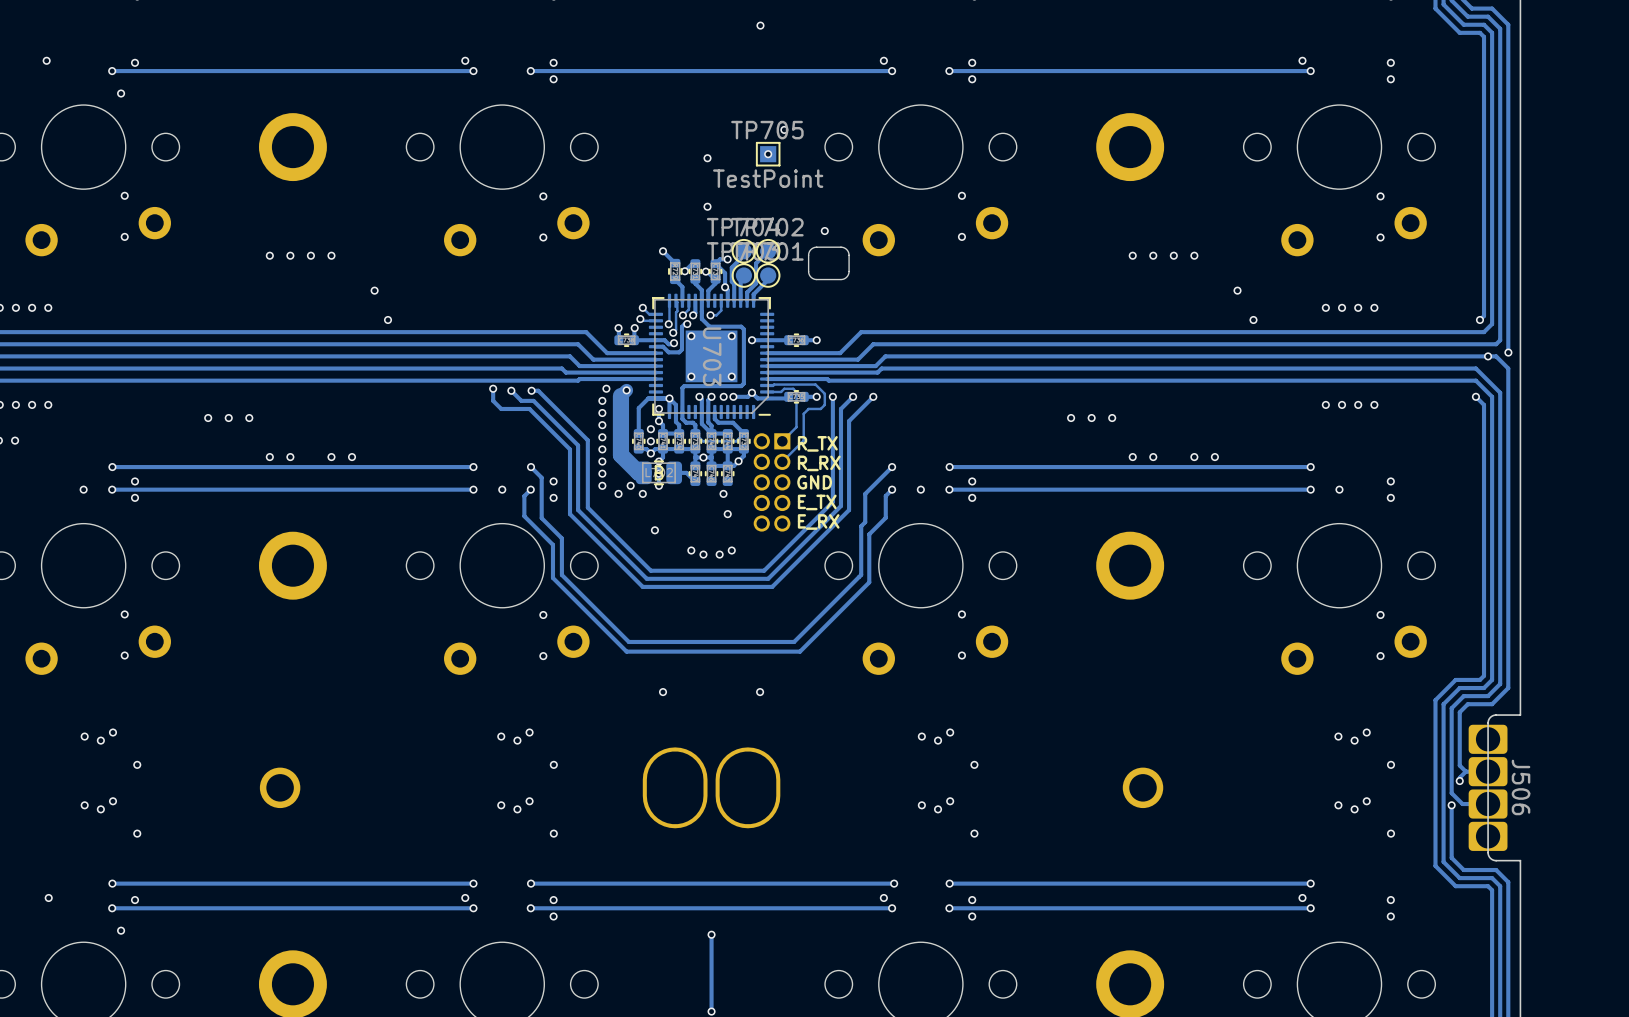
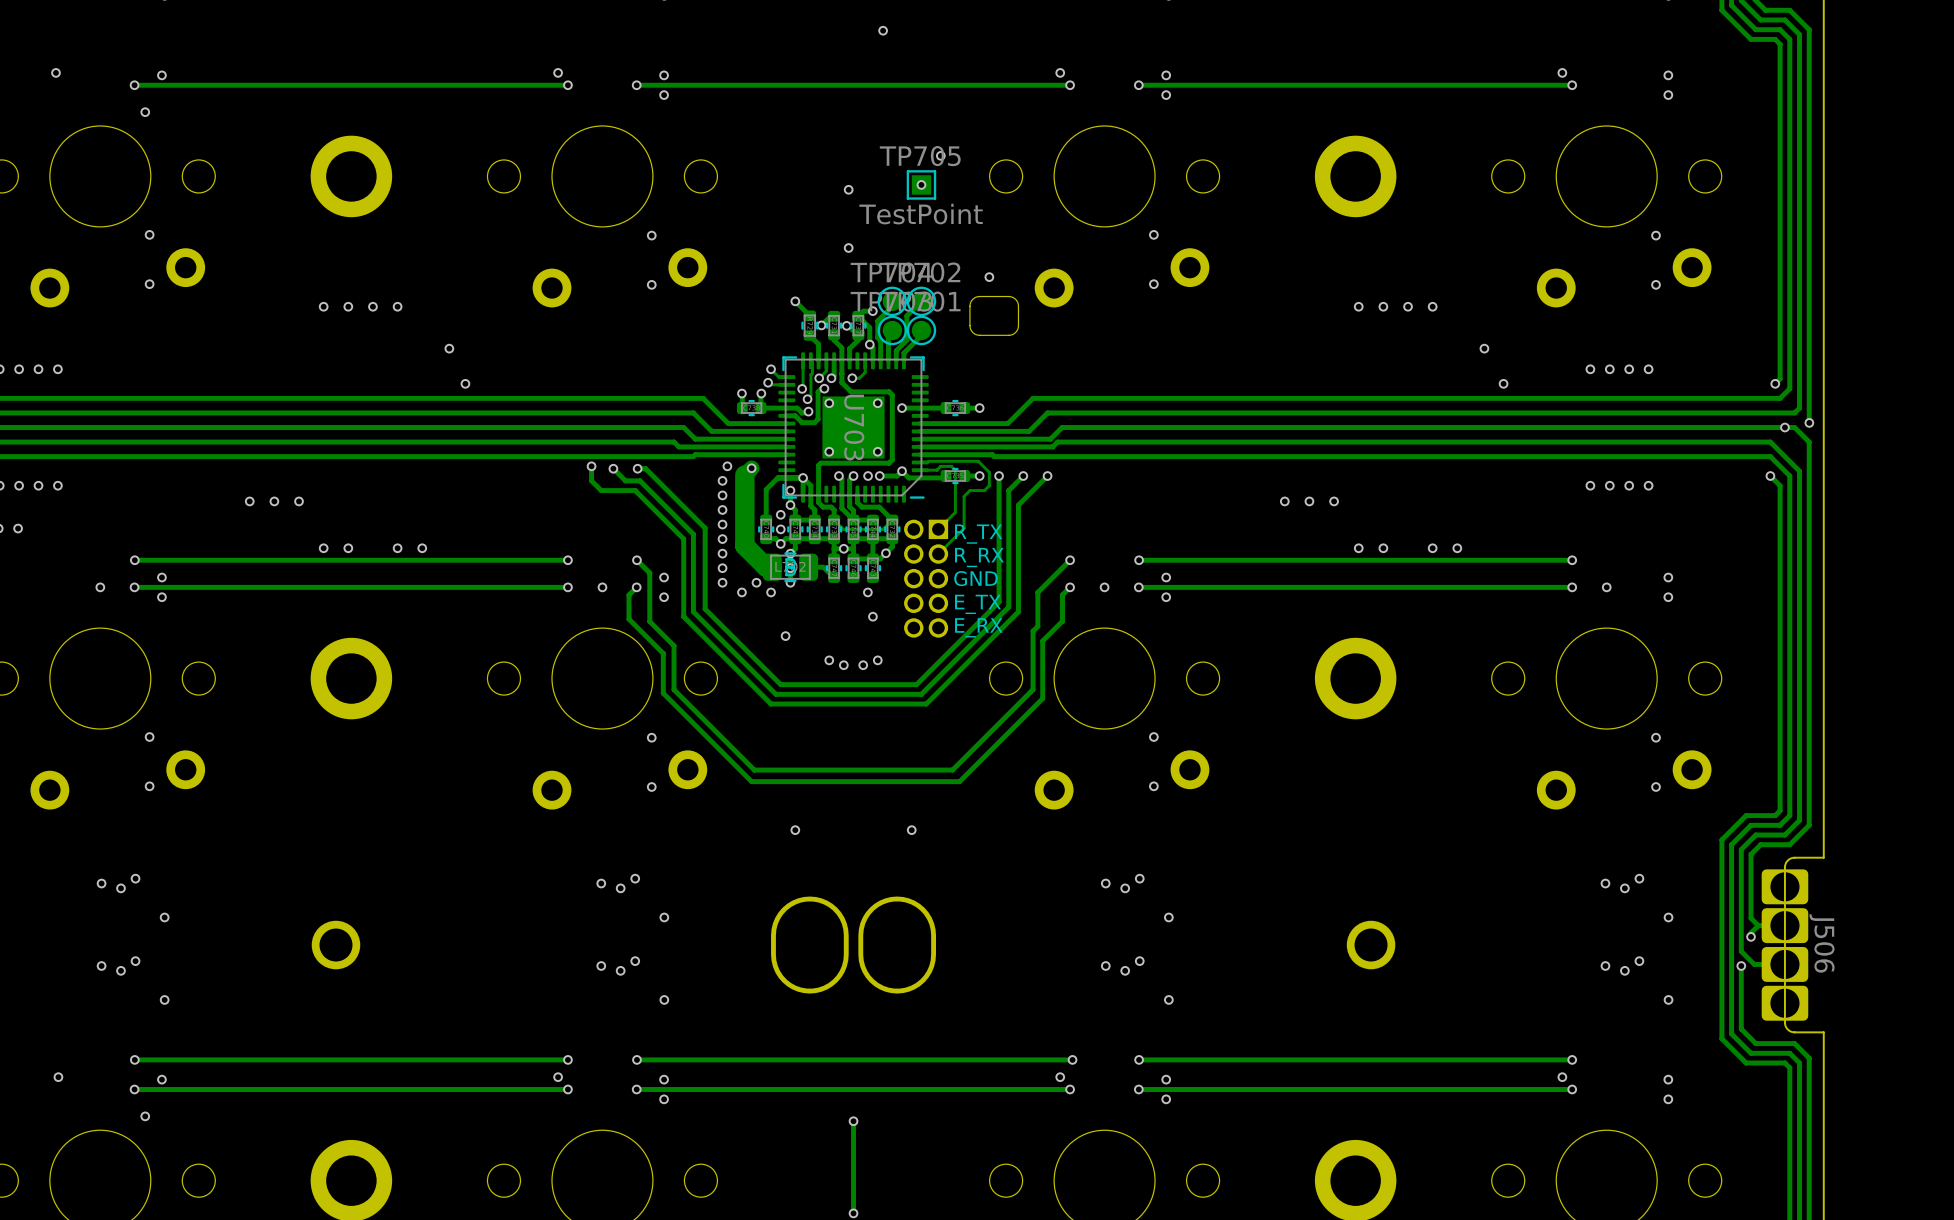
via: none -> (883, 30)
via: (760, 25) -> none

